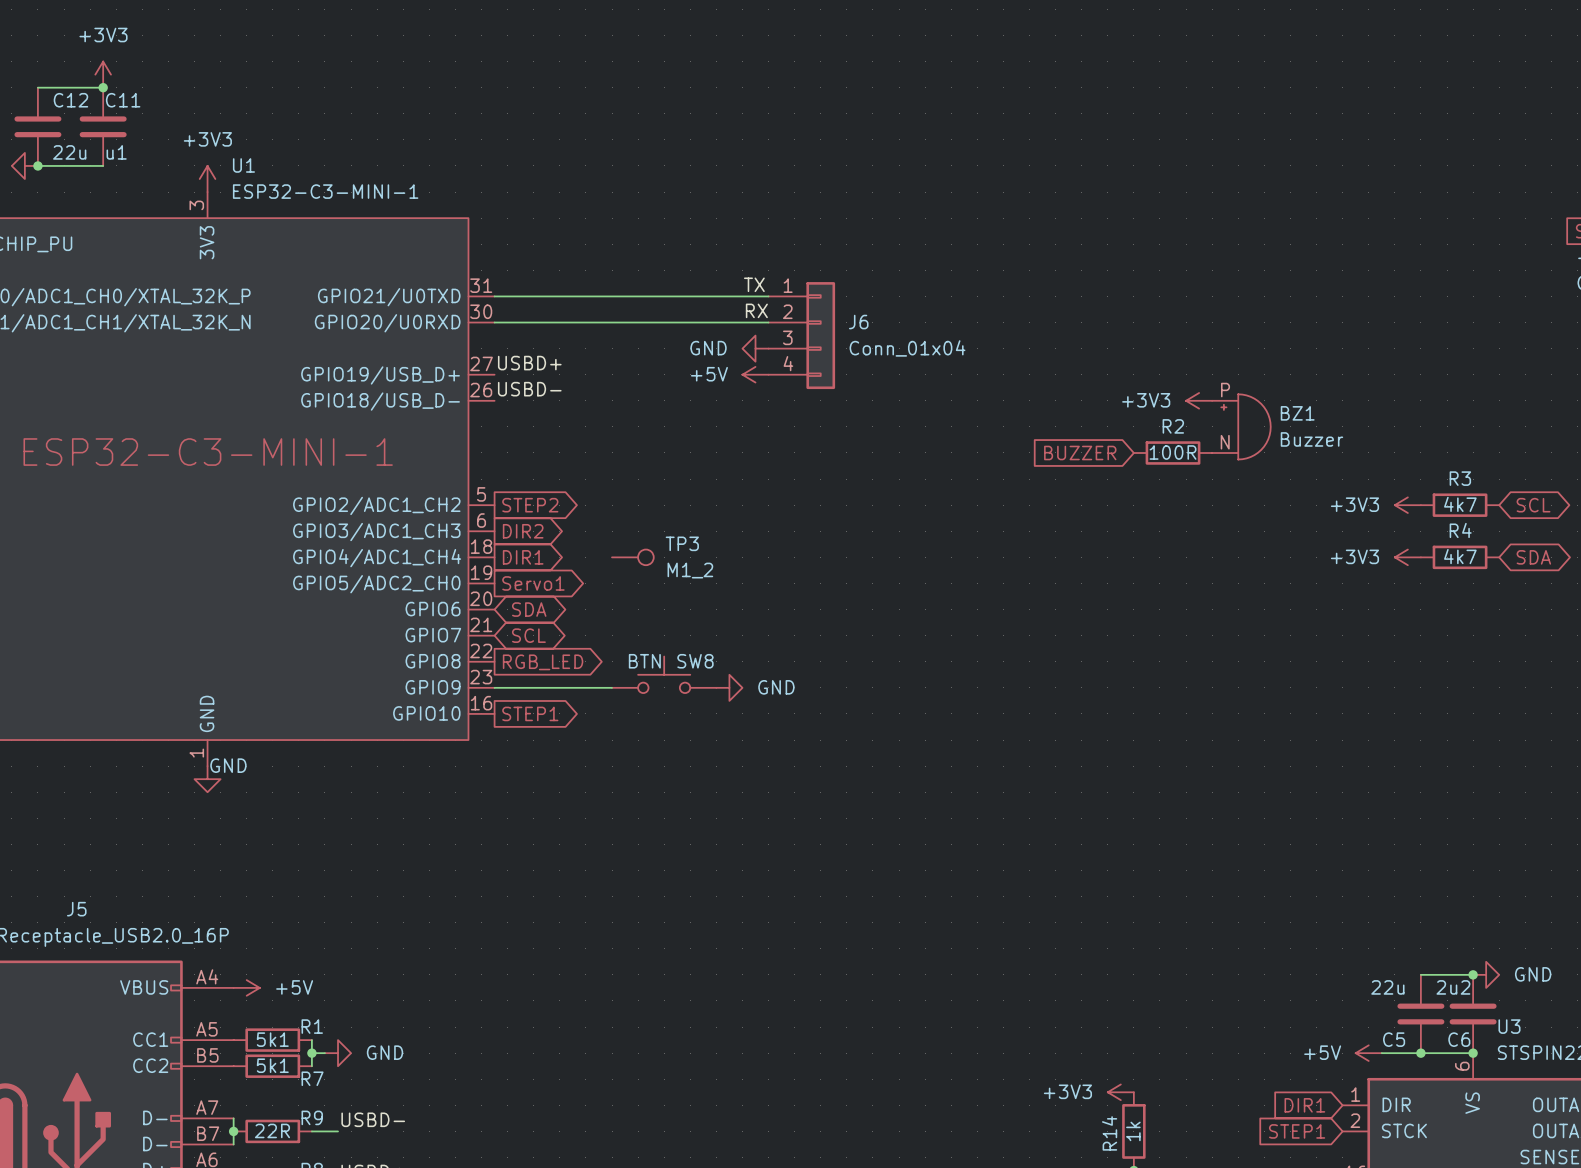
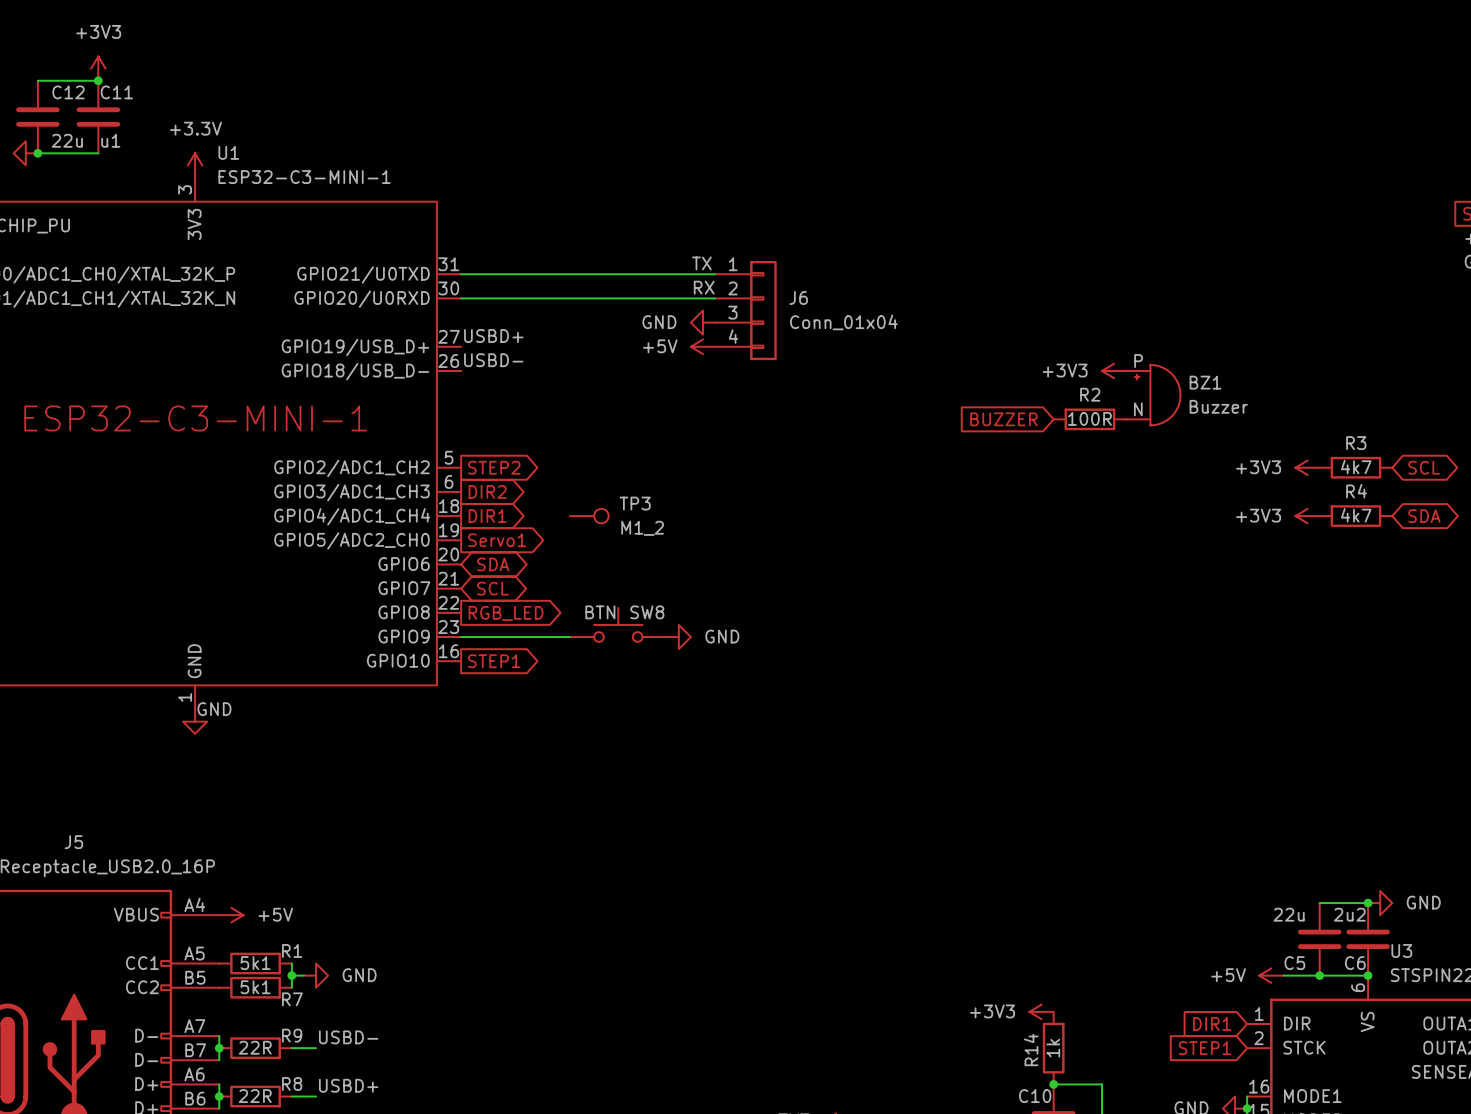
power symbol: +3V3 (207, 179) -> +3.3V (195, 165)

